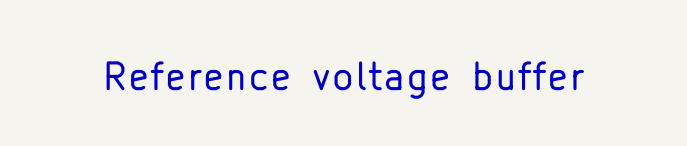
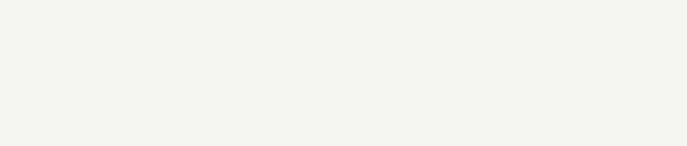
text: Reference voltage buffer (345, 80) -> none

